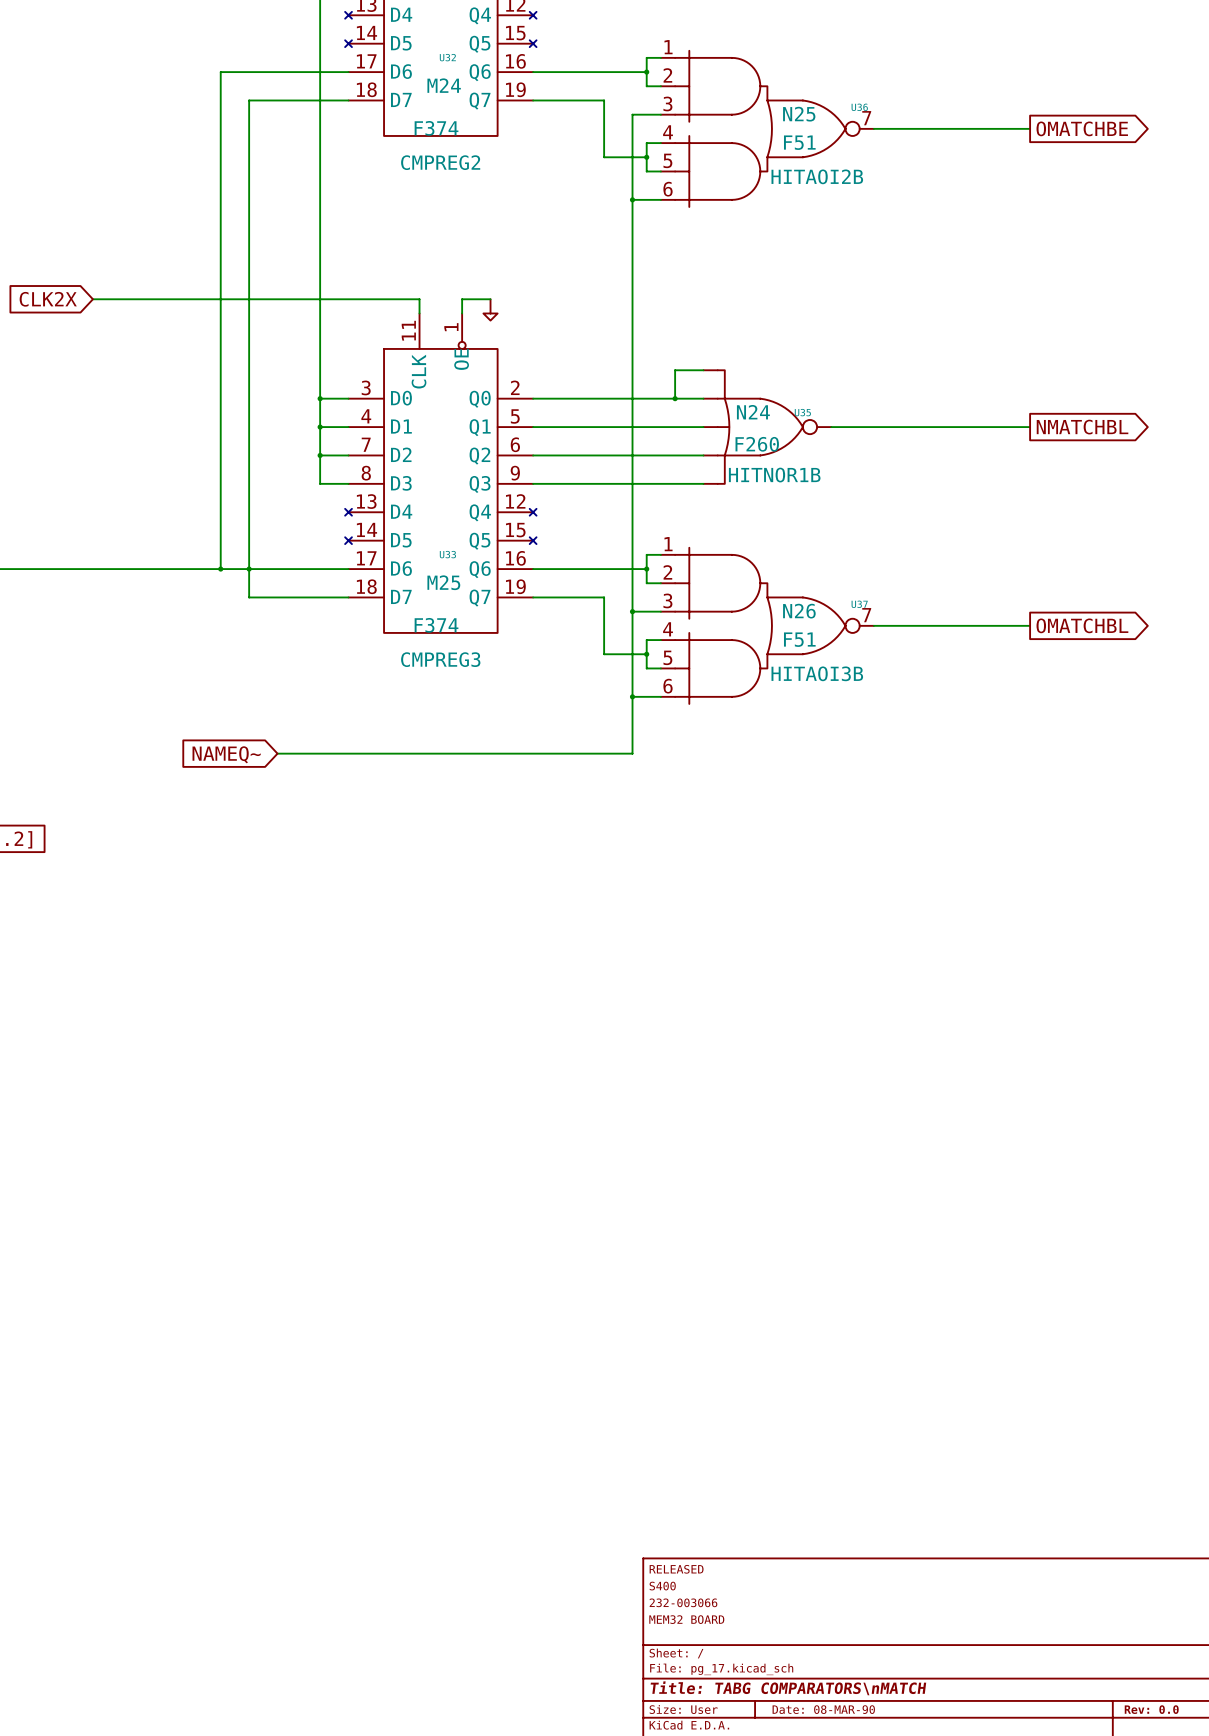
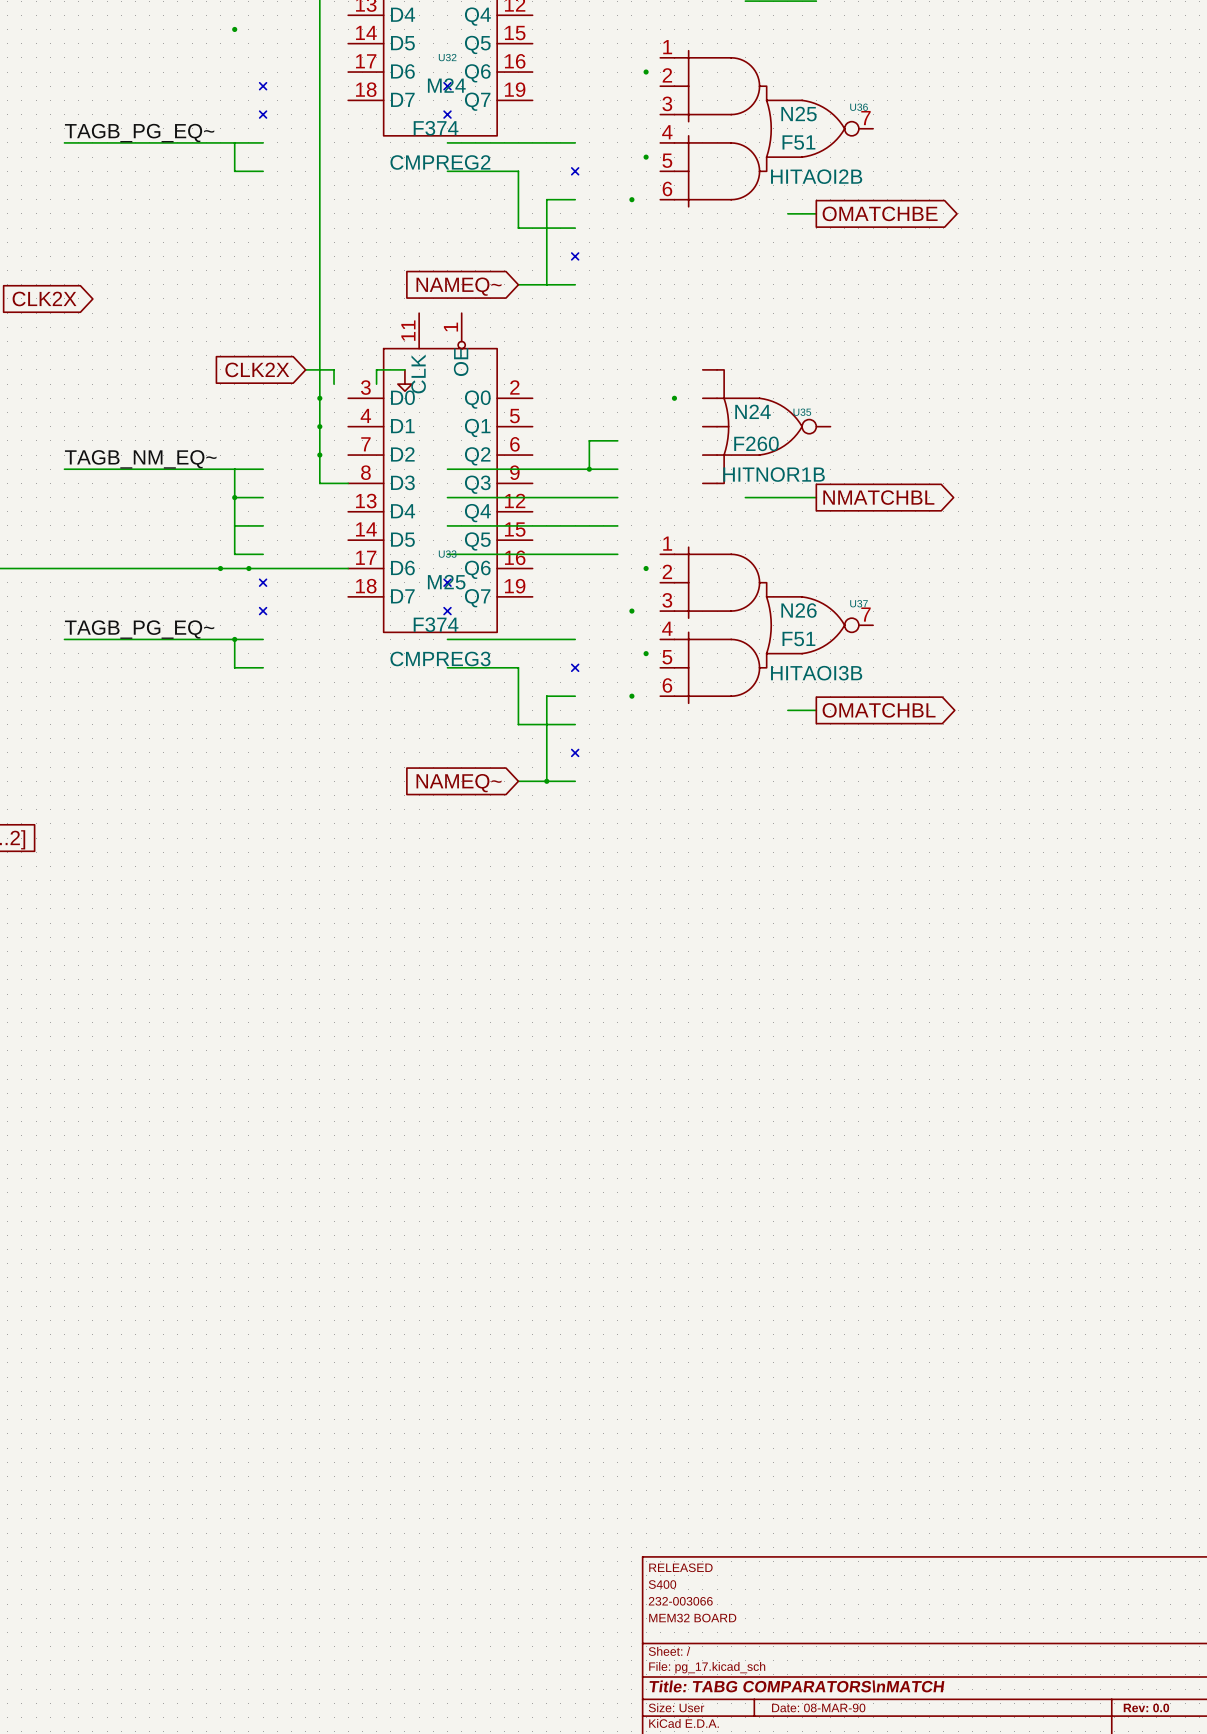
wire: none -> (745, 1) (816, 1)
no-connect mark: (348, 15) -> none
no-connect mark: (533, 15) -> none
junction: none -> (234, 29)
no-connect mark: (348, 43) -> none
no-connect mark: (533, 43) -> none
wire: (660, 57) (646, 57) (646, 86) (660, 86) -> none
wire: (348, 72) (220, 72) (220, 569) -> none
wire: (533, 72) (646, 72) -> none
no-connect mark: none -> (263, 86)
no-connect mark: none -> (447, 86)
wire: (348, 100) (249, 100) (249, 597) (348, 597) -> none
wire: (533, 100) (604, 100) (604, 157) (646, 157) -> none
no-connect mark: none -> (263, 114)
no-connect mark: none -> (447, 114)
wire: (660, 114) (632, 114) (632, 753) (277, 753) -> none
wire: (873, 128) (1030, 128) -> none
global label: OMATCHBE (1082, 128) -> none
label: none -> TAGB_PG_EQ~ (139, 133)
wire: none -> (64, 142) (263, 142)
wire: none -> (234, 142) (234, 171) (263, 171)
wire: none -> (447, 142) (575, 142)
wire: (660, 143) (646, 143) (646, 171) (660, 171) -> none
wire: none -> (447, 171) (518, 171) (518, 228) (575, 228)
no-connect mark: none -> (575, 171)
wire: none -> (575, 199) (546, 199) (546, 284)
wire: (632, 199) (660, 199) -> none
wire: none -> (787, 213) (816, 213)
global label: none -> OMATCHBE (880, 213)
no-connect mark: none -> (575, 256)
wire: none -> (518, 284) (575, 284)
global label: none -> NAMEQ~ (459, 286)
wire: (92, 299) (419, 299) (419, 313) -> none
wire: (490, 299) (462, 299) (462, 313) -> (404, 369) (376, 369) (376, 384)
power symbol position: (490, 310) -> (404, 380)
global label: none -> CLK2X (257, 369)
wire: none -> (305, 369) (334, 369) (334, 384)
wire: (703, 370) (675, 370) (675, 398) -> (617, 440) (589, 440) (589, 469)
wire: (320, 398) (348, 398) -> none
wire: (533, 398) (703, 398) -> (447, 469) (617, 469)
wire: (320, 427) (348, 427) -> (234, 497) (263, 497)
wire: (533, 427) (703, 427) -> (447, 497) (617, 497)
wire: (831, 427) (1030, 427) -> none
global label: NMATCHBL (1082, 427) -> none
wire: (320, 455) (348, 455) -> (234, 525) (263, 525)
wire: (533, 455) (703, 455) -> (447, 525) (617, 525)
label: none -> TAGB_NM_EQ~ (140, 459)
wire: none -> (64, 469) (263, 469)
wire: none -> (234, 469) (234, 554) (263, 554)
junction: none -> (589, 469)
wire: (533, 483) (703, 483) -> (447, 554) (617, 554)
junction: none -> (234, 497)
wire: none -> (745, 497) (816, 497)
global label: none -> NMATCHBL (878, 497)
no-connect mark: (348, 512) -> none
no-connect mark: (533, 512) -> none
no-connect mark: (348, 540) -> none
no-connect mark: (533, 540) -> none
wire: (660, 554) (646, 554) (646, 583) (660, 583) -> none
wire: (533, 569) (646, 569) -> none
no-connect mark: none -> (263, 582)
no-connect mark: none -> (447, 582)
wire: (533, 597) (604, 597) (604, 654) (646, 654) -> none
no-connect mark: none -> (263, 611)
no-connect mark: none -> (447, 611)
wire: (632, 611) (660, 611) -> none
wire: (873, 625) (1030, 625) -> none
global label: OMATCHBL (1082, 625) -> none
label: none -> TAGB_PG_EQ~ (139, 629)
wire: none -> (64, 639) (263, 639)
wire: none -> (234, 639) (234, 667) (263, 667)
junction: none -> (234, 639)
wire: none -> (447, 639) (575, 639)
wire: (660, 640) (646, 640) (646, 668) (660, 668) -> none
wire: none -> (447, 667) (518, 667) (518, 724) (575, 724)
no-connect mark: none -> (575, 667)
wire: none -> (575, 696) (546, 696) (546, 781)
wire: (632, 696) (660, 696) -> none
wire: none -> (787, 710) (816, 710)
global label: none -> OMATCHBL (879, 710)
no-connect mark: none -> (575, 752)
global label: NAMEQ~ (226, 754) -> none
wire: none -> (518, 781) (575, 781)
junction: none -> (546, 781)
global label: none -> NAMEQ~ (459, 783)

